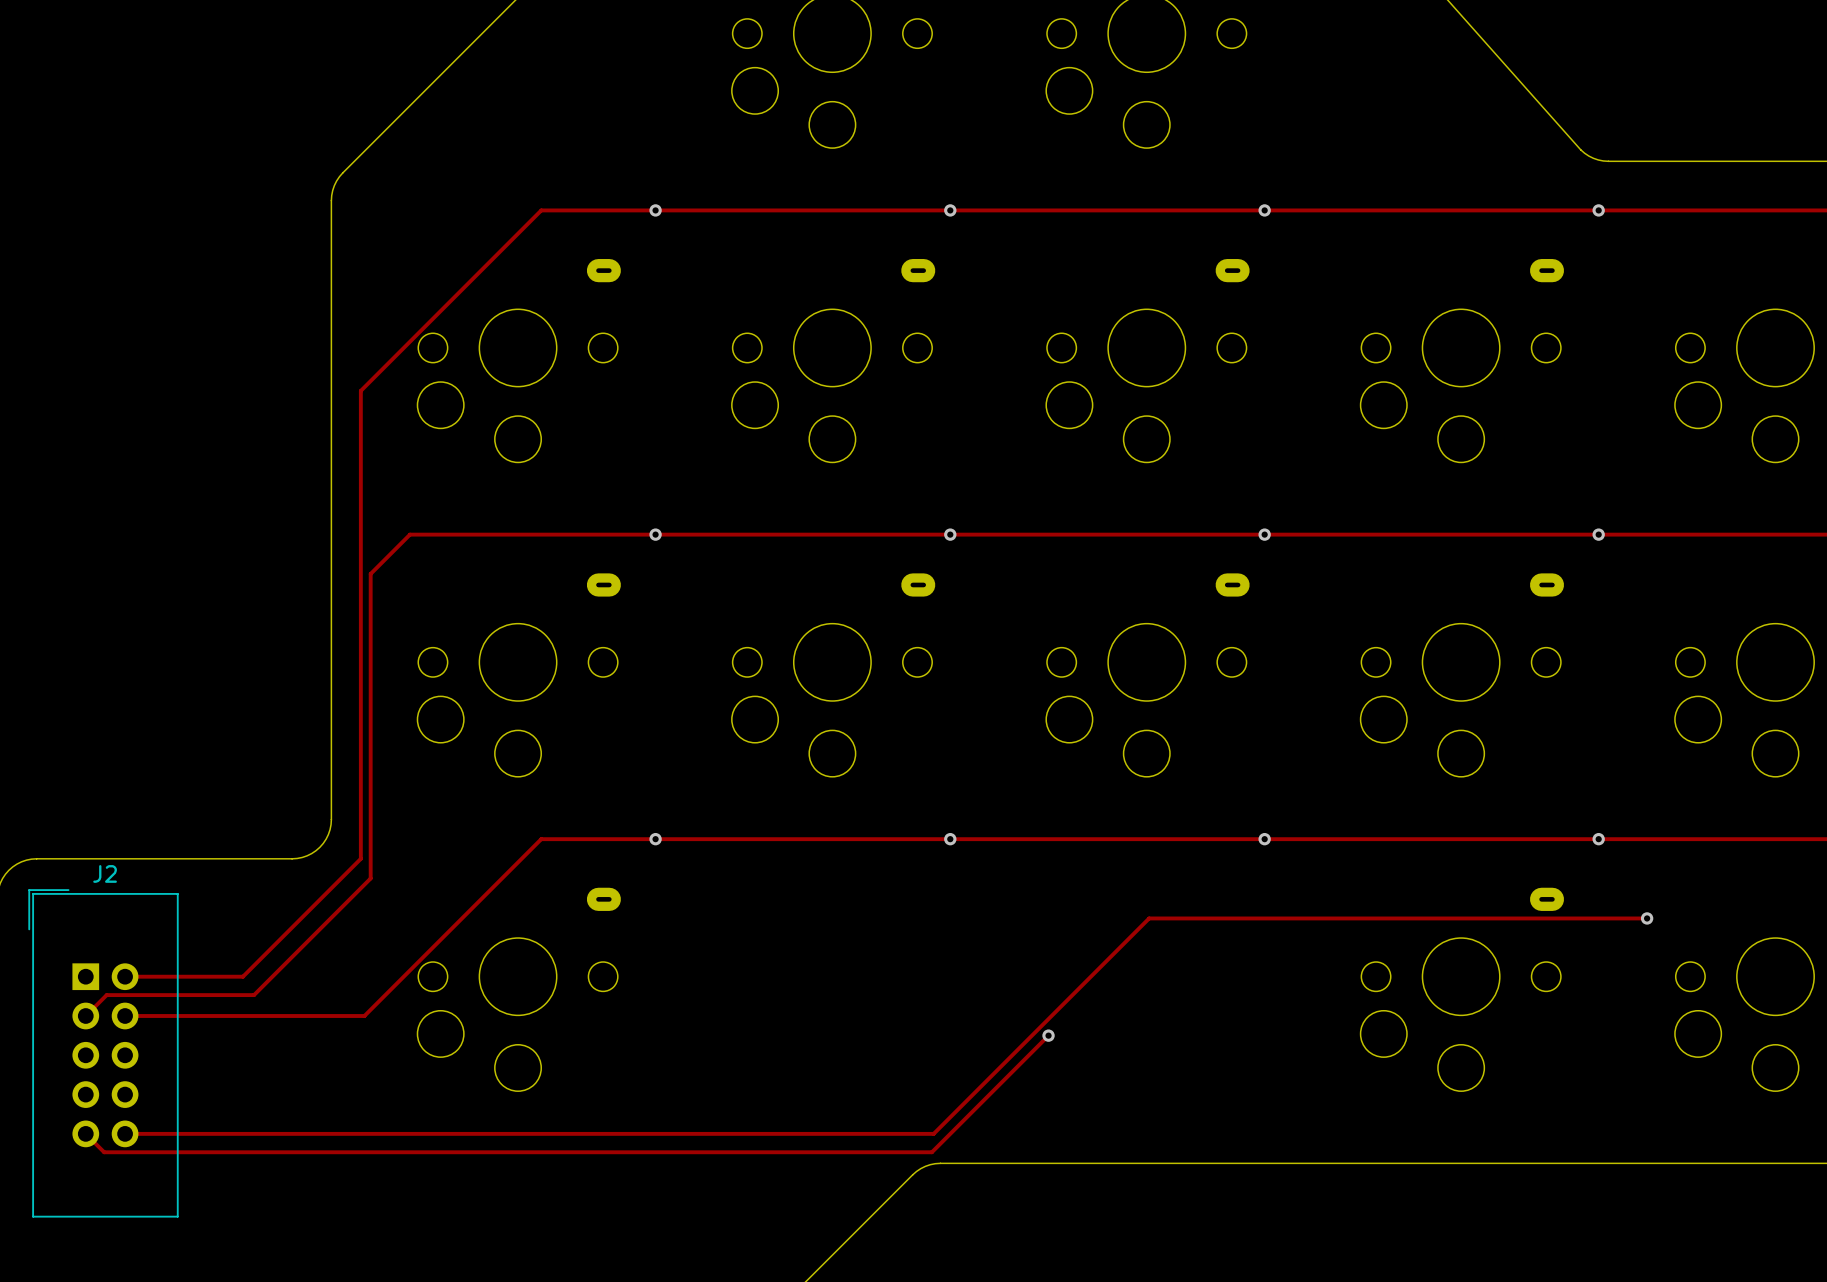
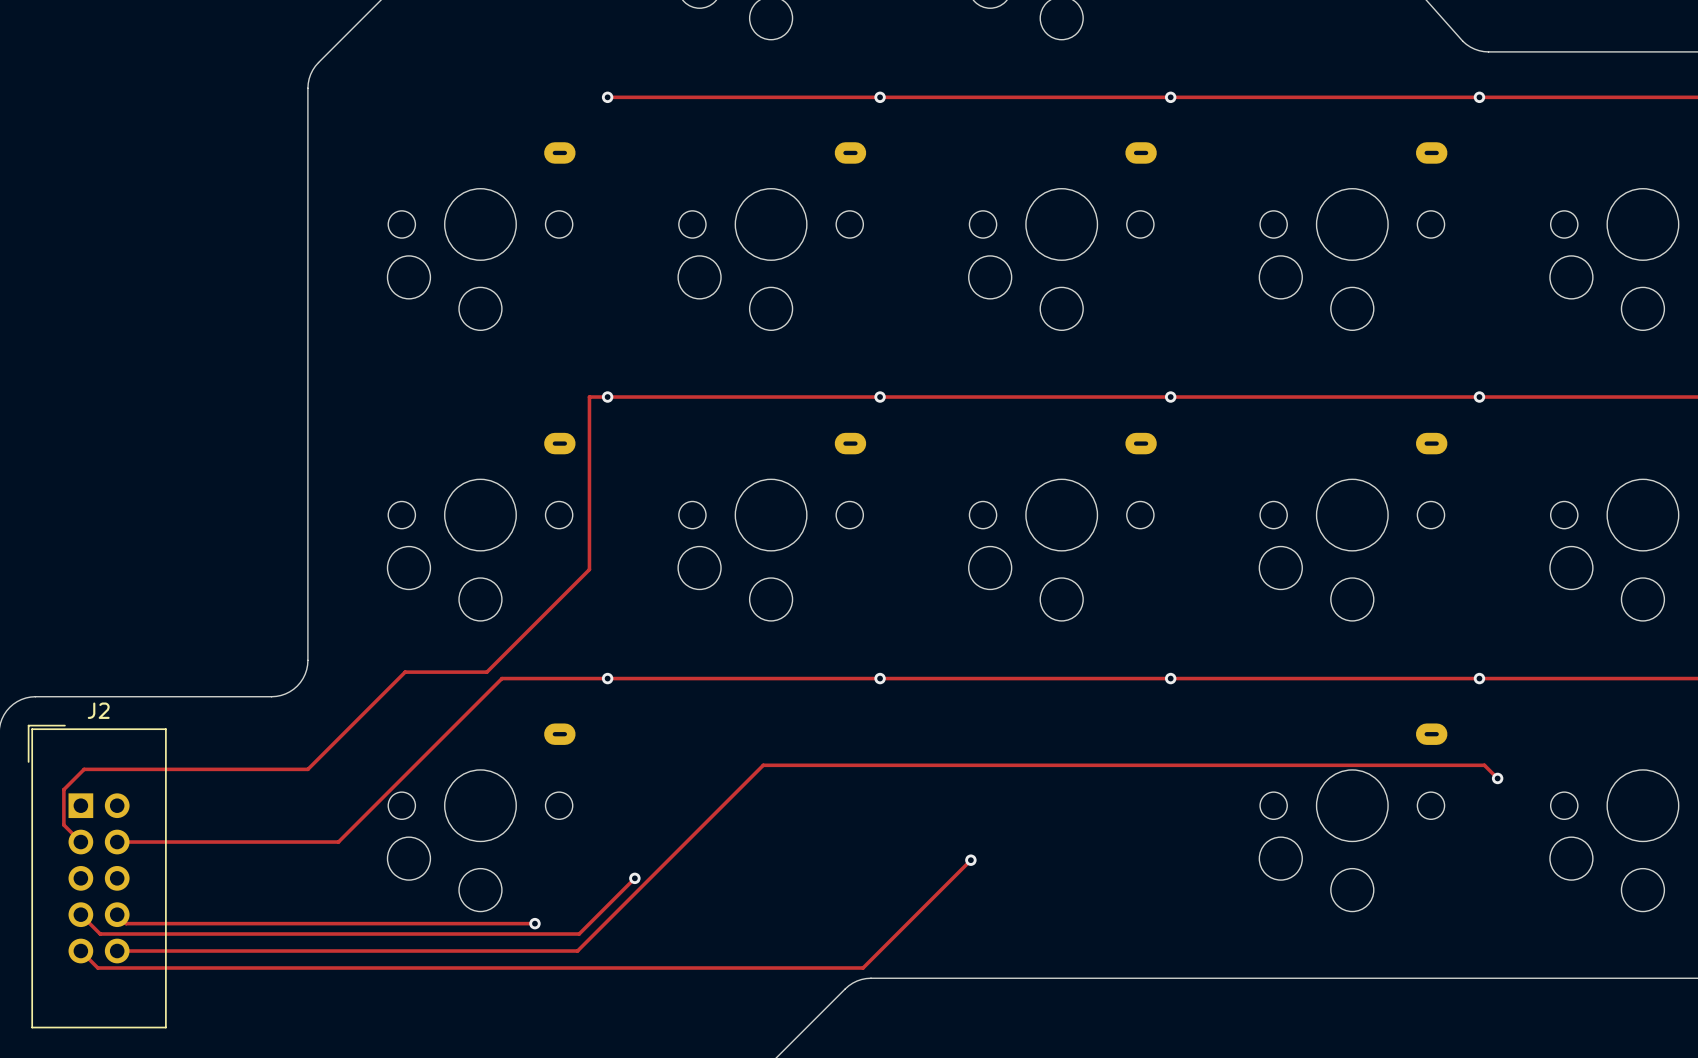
track: (655, 210) (541, 210) (360, 390) (360, 858) (242, 976) (125, 976) -> none
track: (635, 534) (409, 534) (370, 573) (370, 878) (254, 995) (106, 995) (85, 1016) -> (589, 397) (589, 569) (486, 672) (405, 672) (307, 769) (84, 769) (63, 789) (63, 825) (80, 842)
track: (1647, 918) (1149, 918) (933, 1133) (623, 1133) -> (1497, 778) (1484, 765) (763, 765) (577, 951)
via position: (1647, 918) -> (1497, 778)
track: none -> (634, 878) (579, 934) (100, 934) (80, 914)
via: none -> (634, 878)
track: none -> (117, 914) (126, 923) (534, 923)
via: none -> (534, 923)

